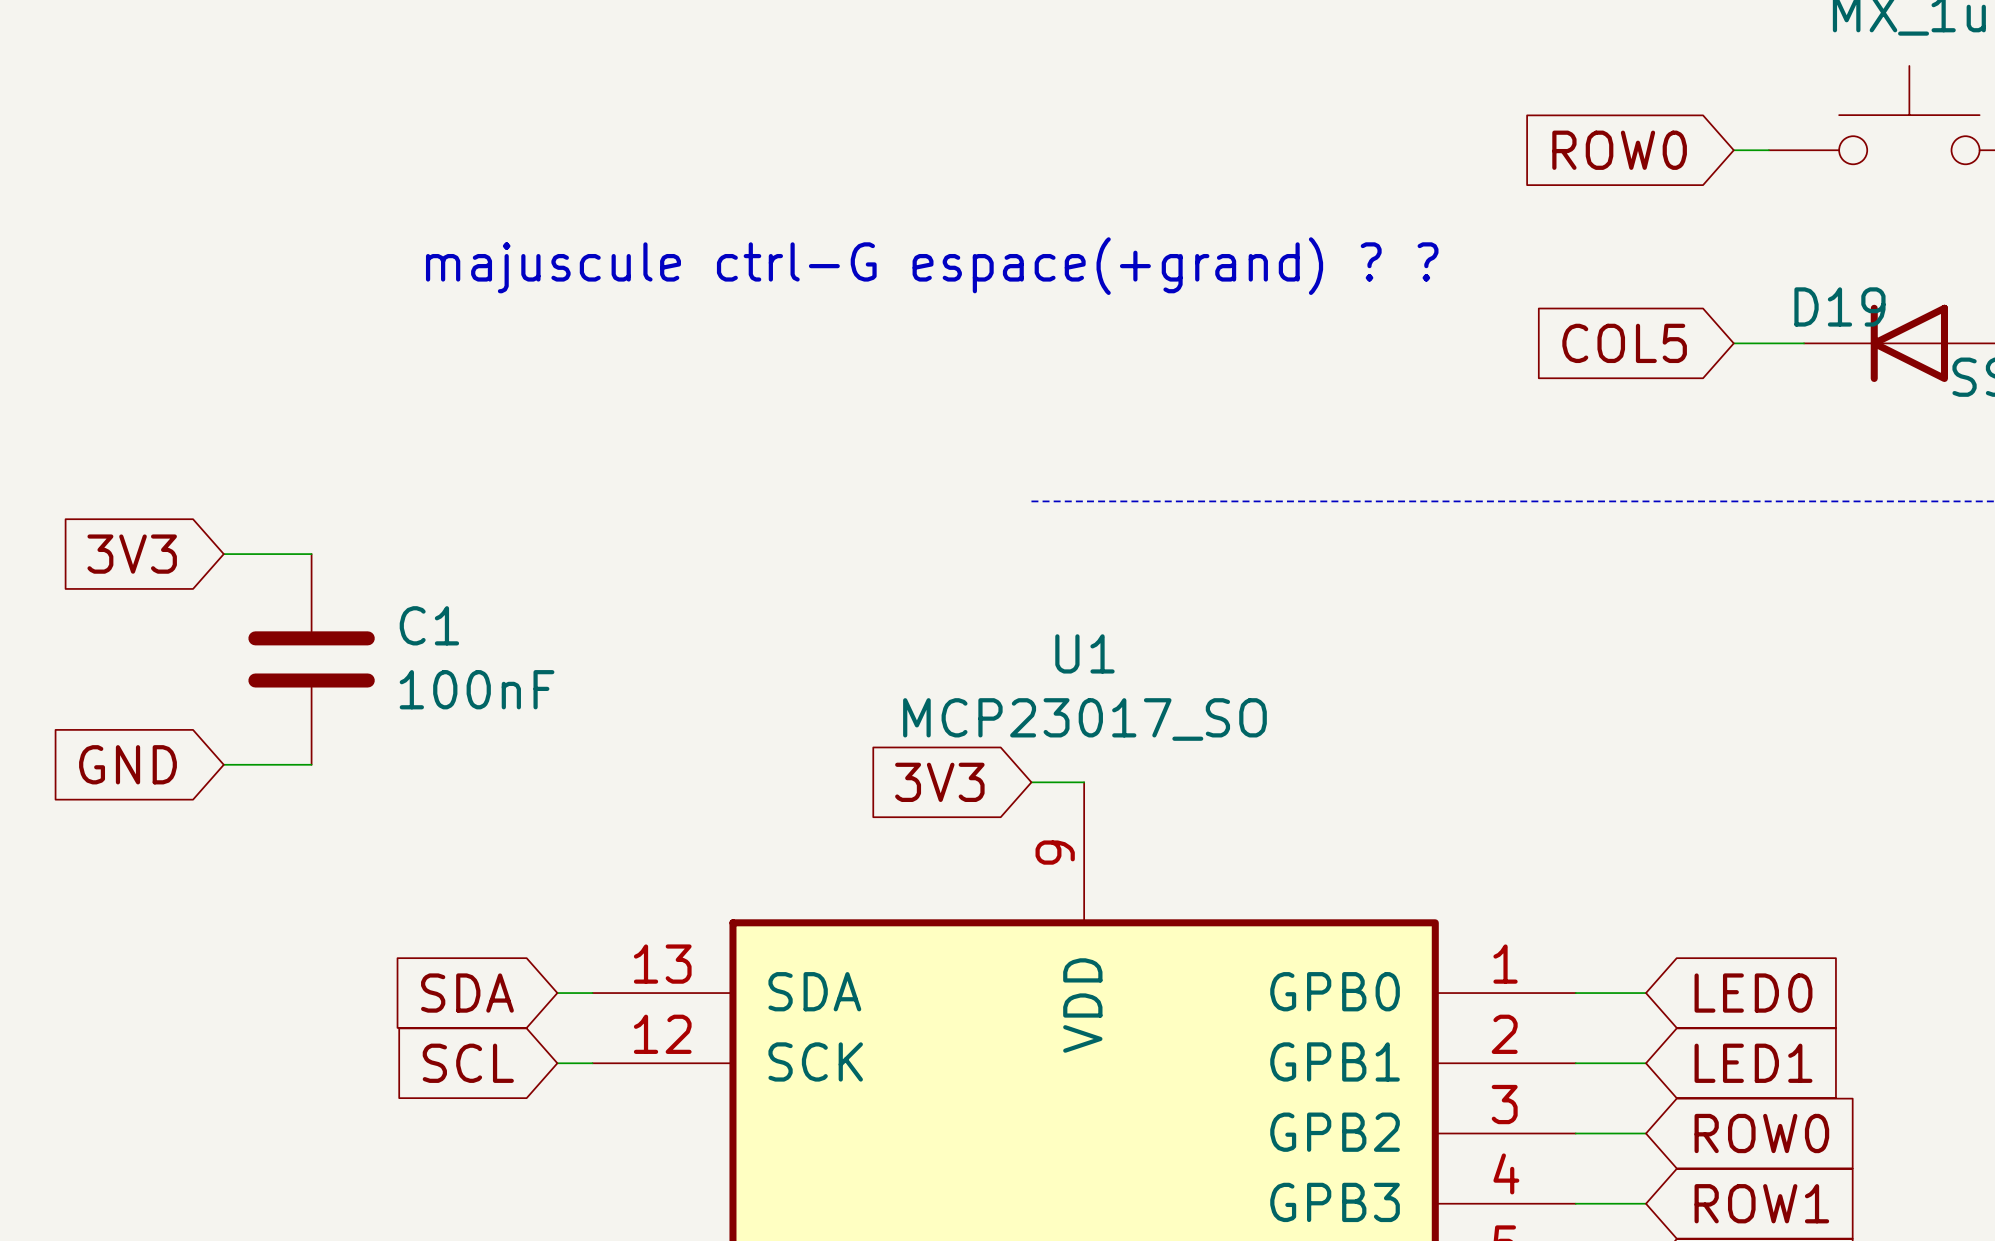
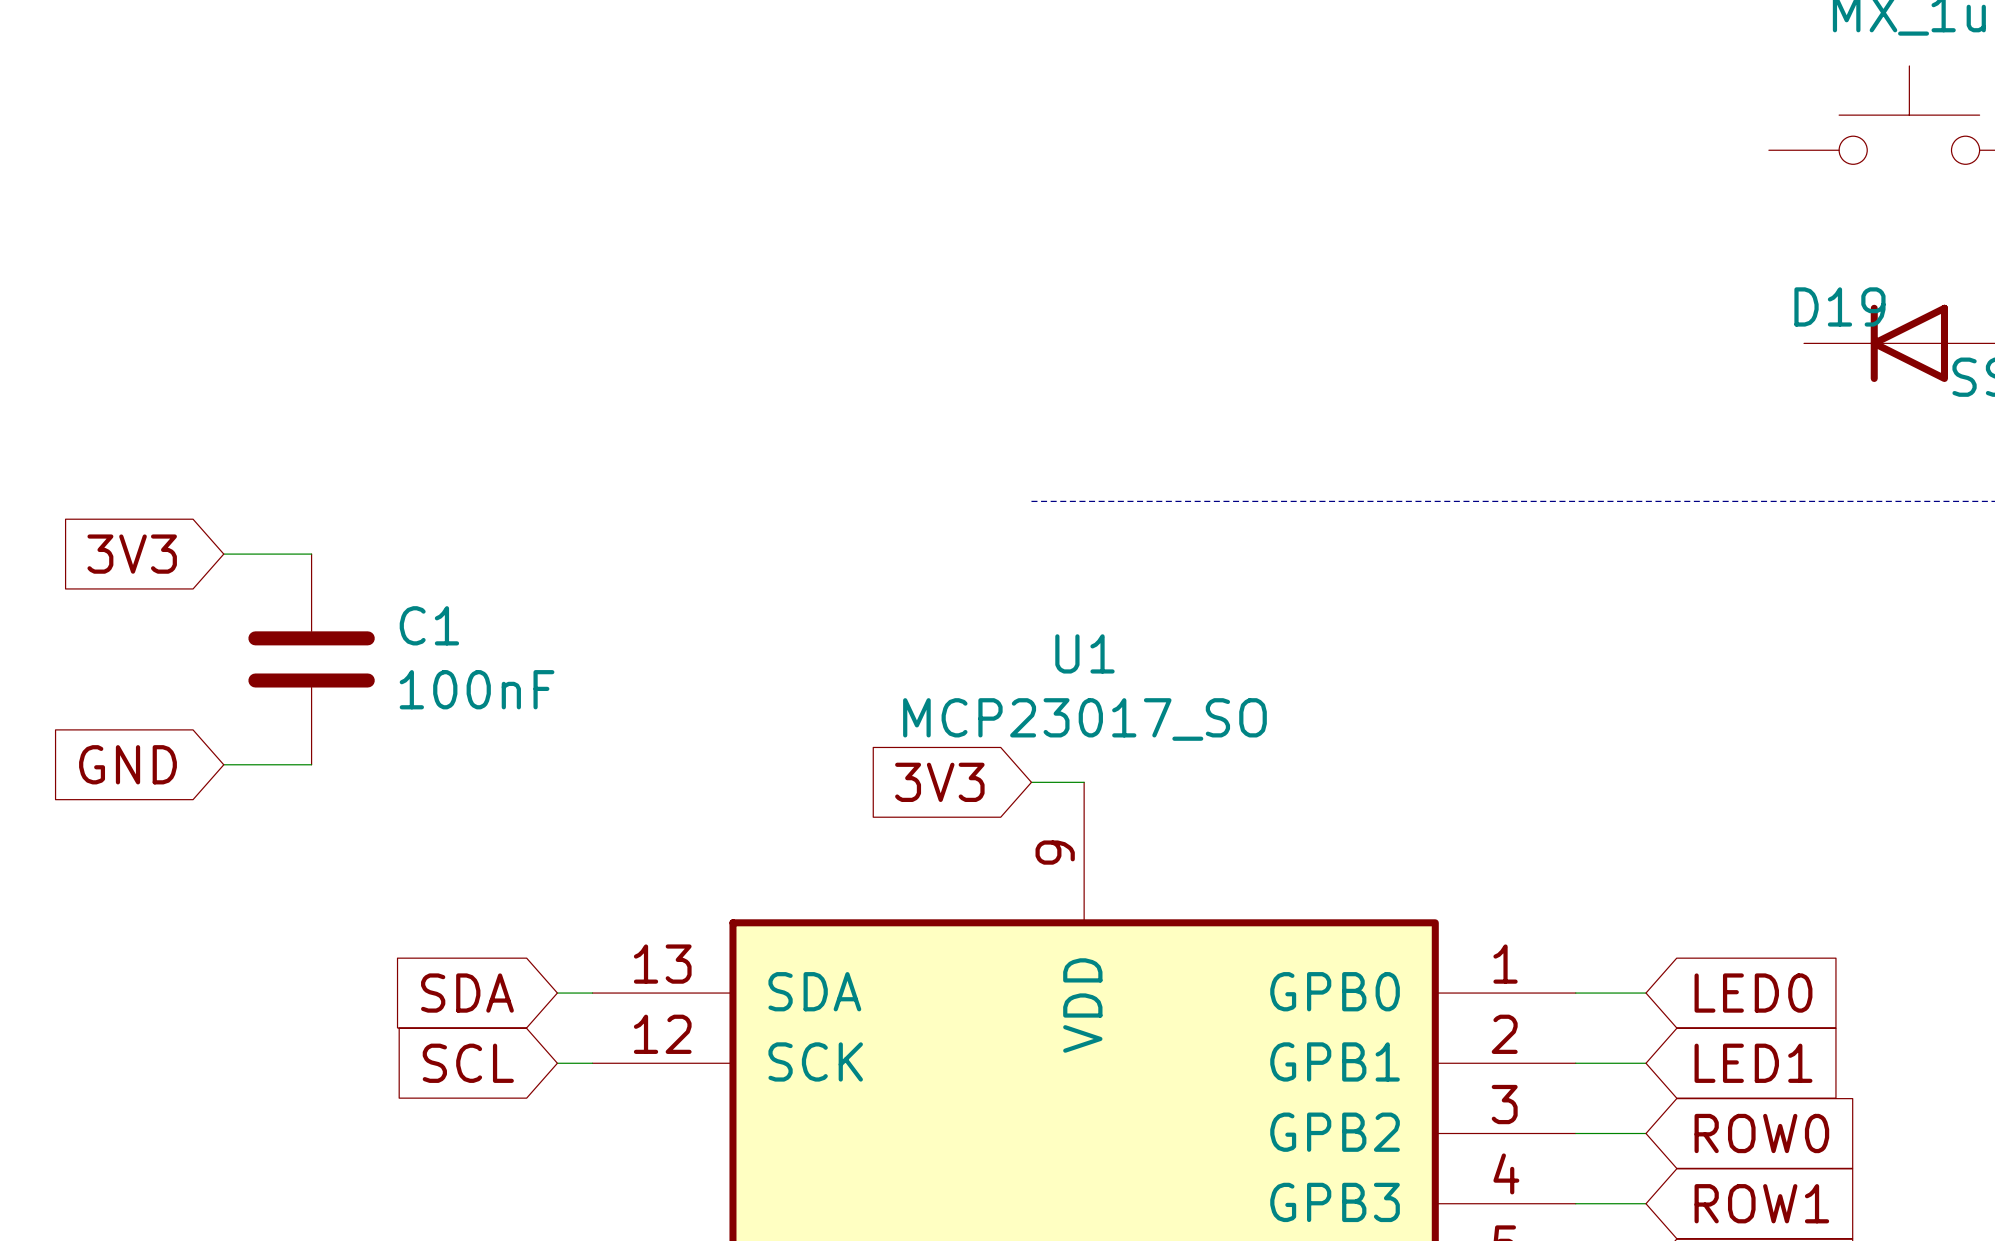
global label: ROW0 (1619, 150) -> none
wire: (1733, 150) (1768, 150) -> none
text: majuscule ctrl-G espace(+grand) ? ? (932, 266) -> none
global label: COL5 (1624, 343) -> none
wire: (1733, 343) (1804, 343) -> none

